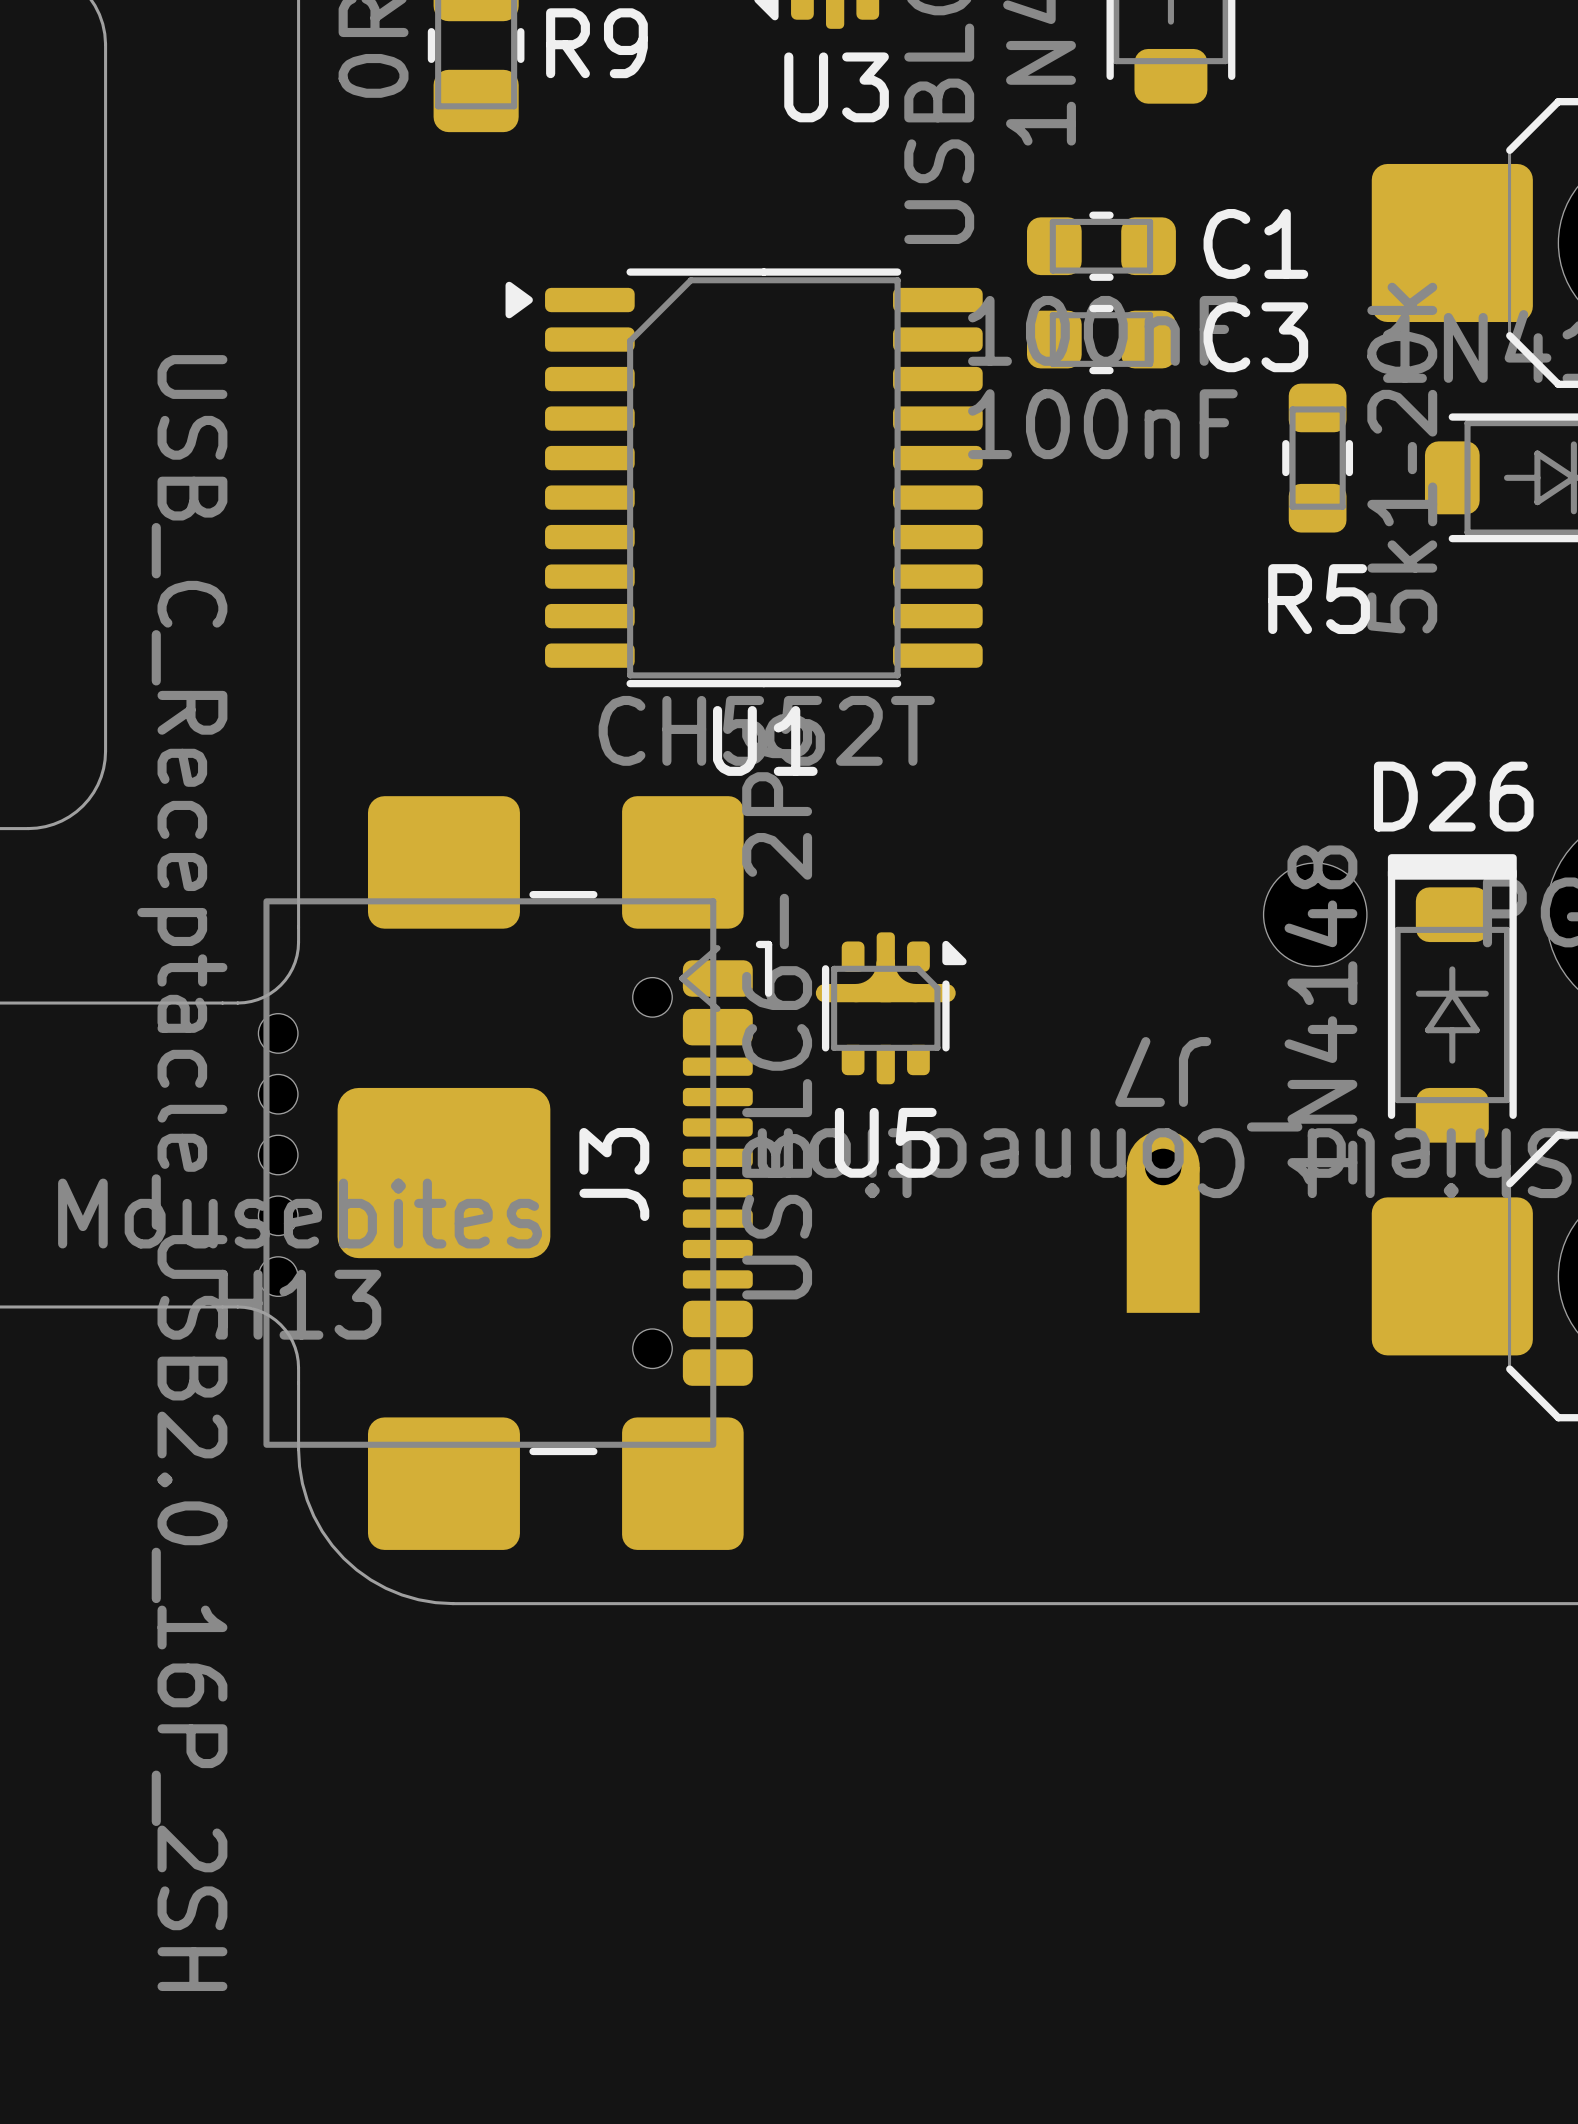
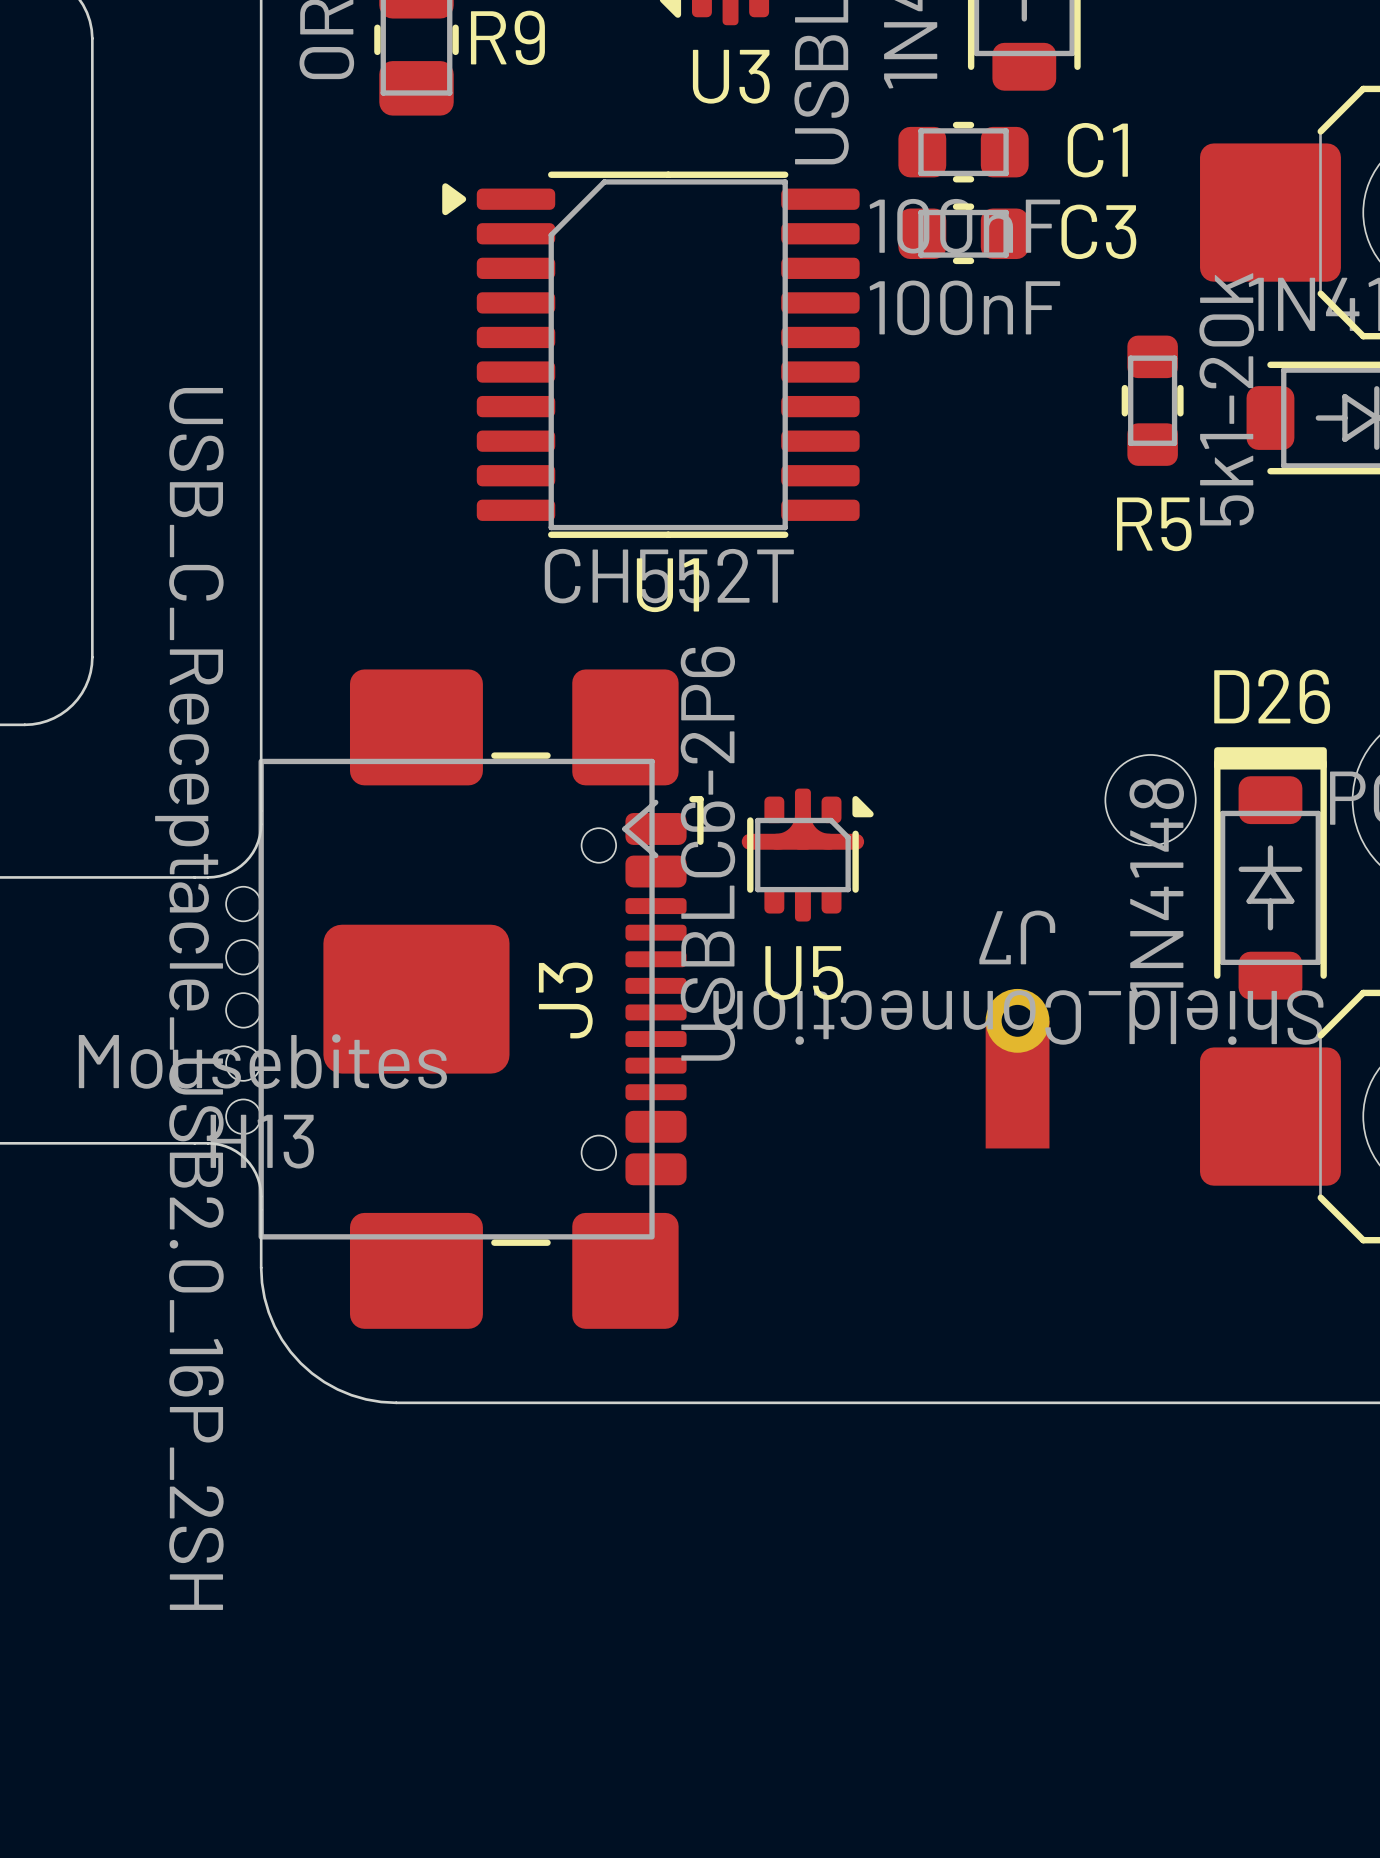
C1 position: (1101, 246) -> (963, 152)
C3 position: (1101, 339) -> (963, 233)
U1 position: (744, 477) -> (650, 354)
U5 position: (891, 1008) -> (807, 855)
J3 position: (517, 1173) -> (481, 999)

